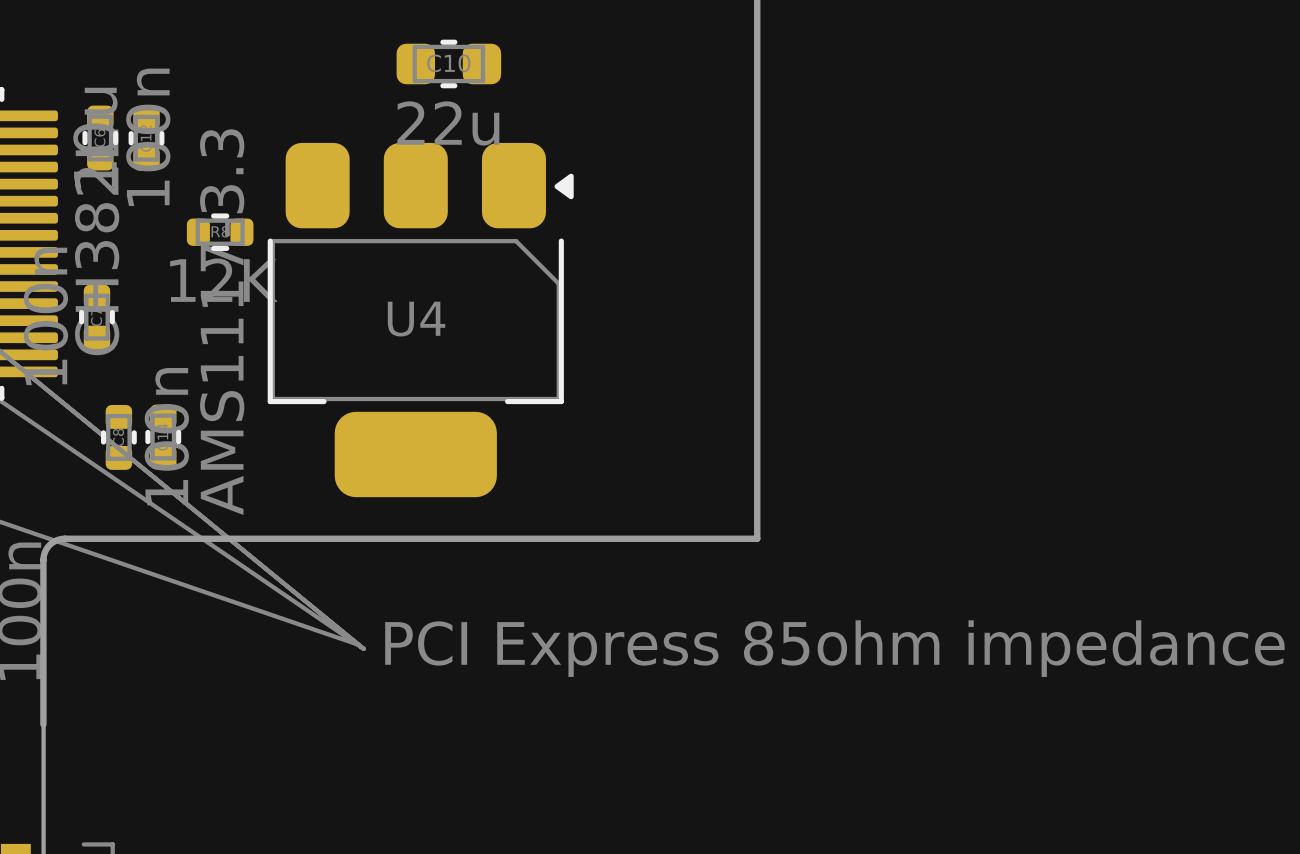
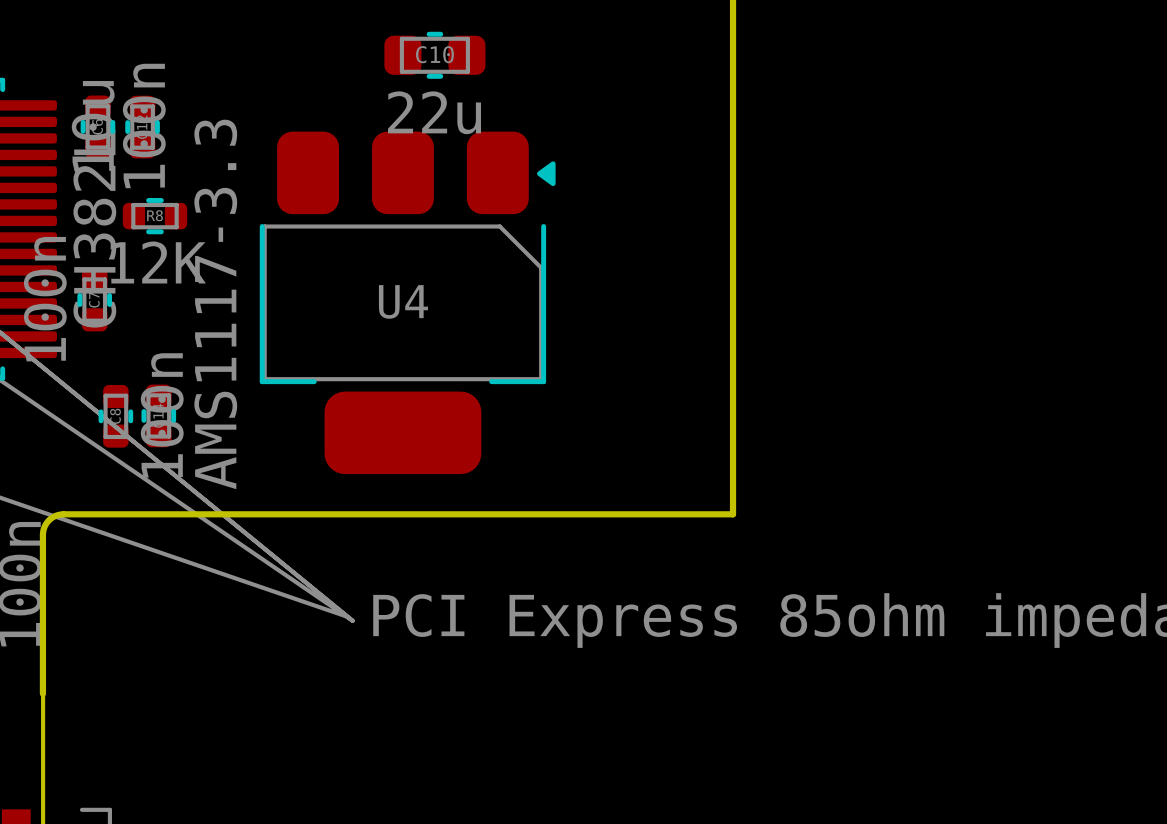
R8 position: (220, 232) -> (154, 216)

